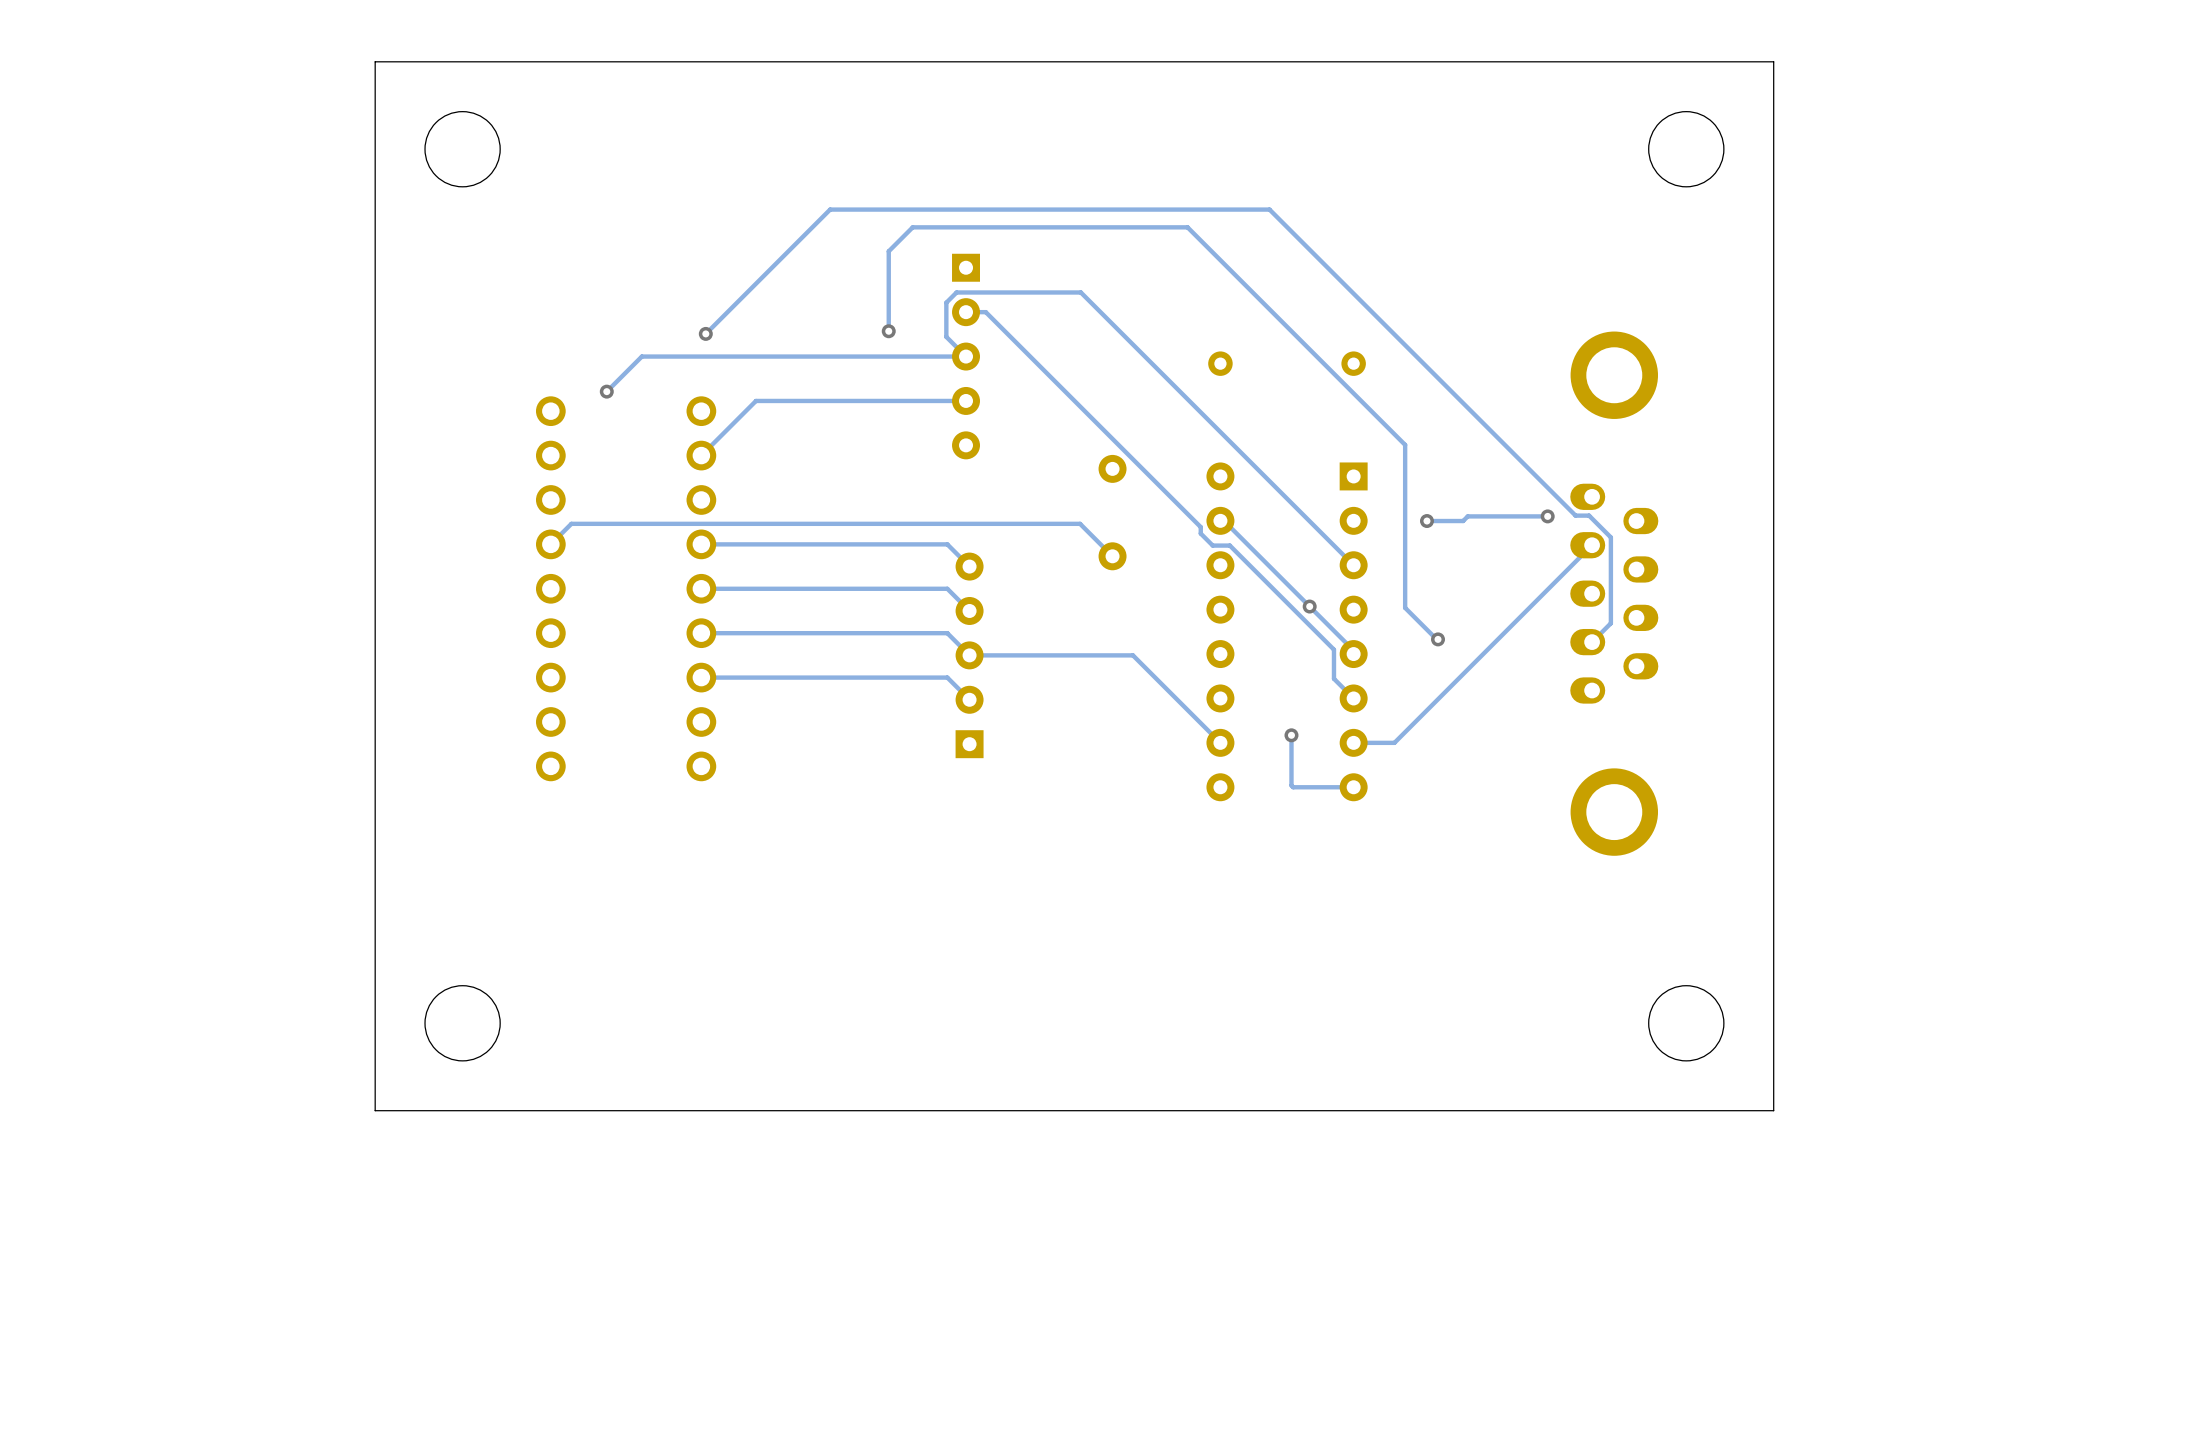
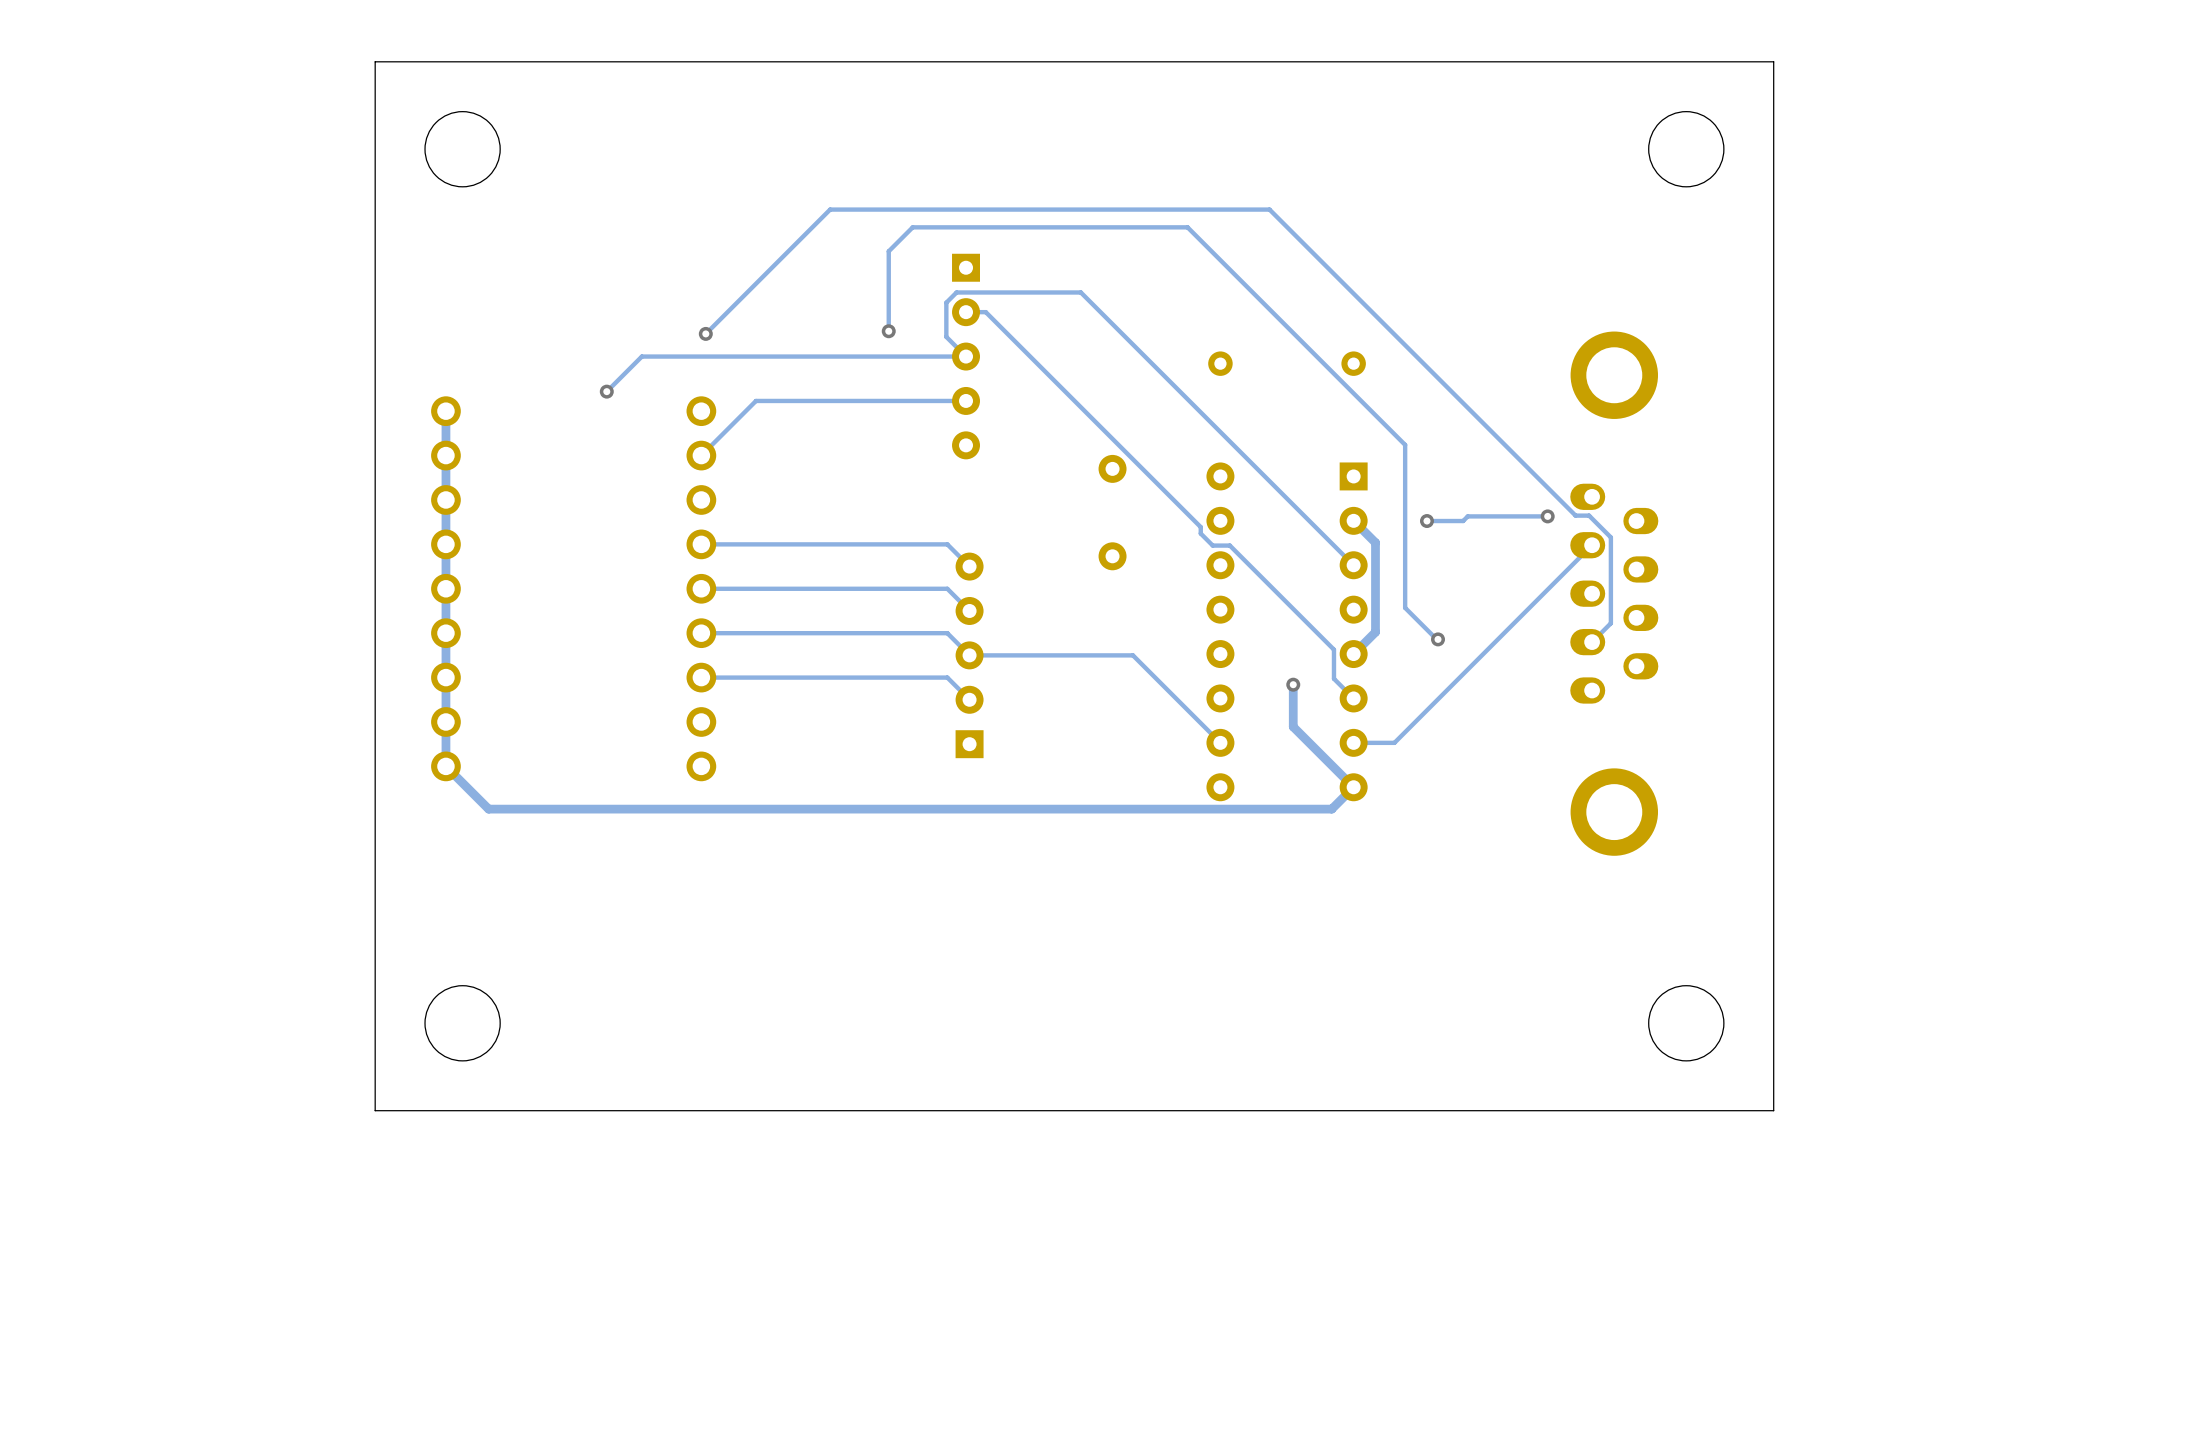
track: none -> (445, 411) (445, 766) (488, 809) (1331, 809) (1353, 787) (1293, 726) (1293, 684)
track: (1223, 520) (1353, 650) -> none
track: none -> (1353, 520) (1375, 542) (1375, 632) (1353, 654)
track: (550, 544) (571, 523) (1080, 523) (1112, 556) -> none
part position: (550, 588) -> (445, 588)
via: (1309, 606) -> none
via: none -> (1293, 684)
track: (1291, 735) (1291, 785) (1293, 787) (1353, 787) -> none
via: (1291, 735) -> none

